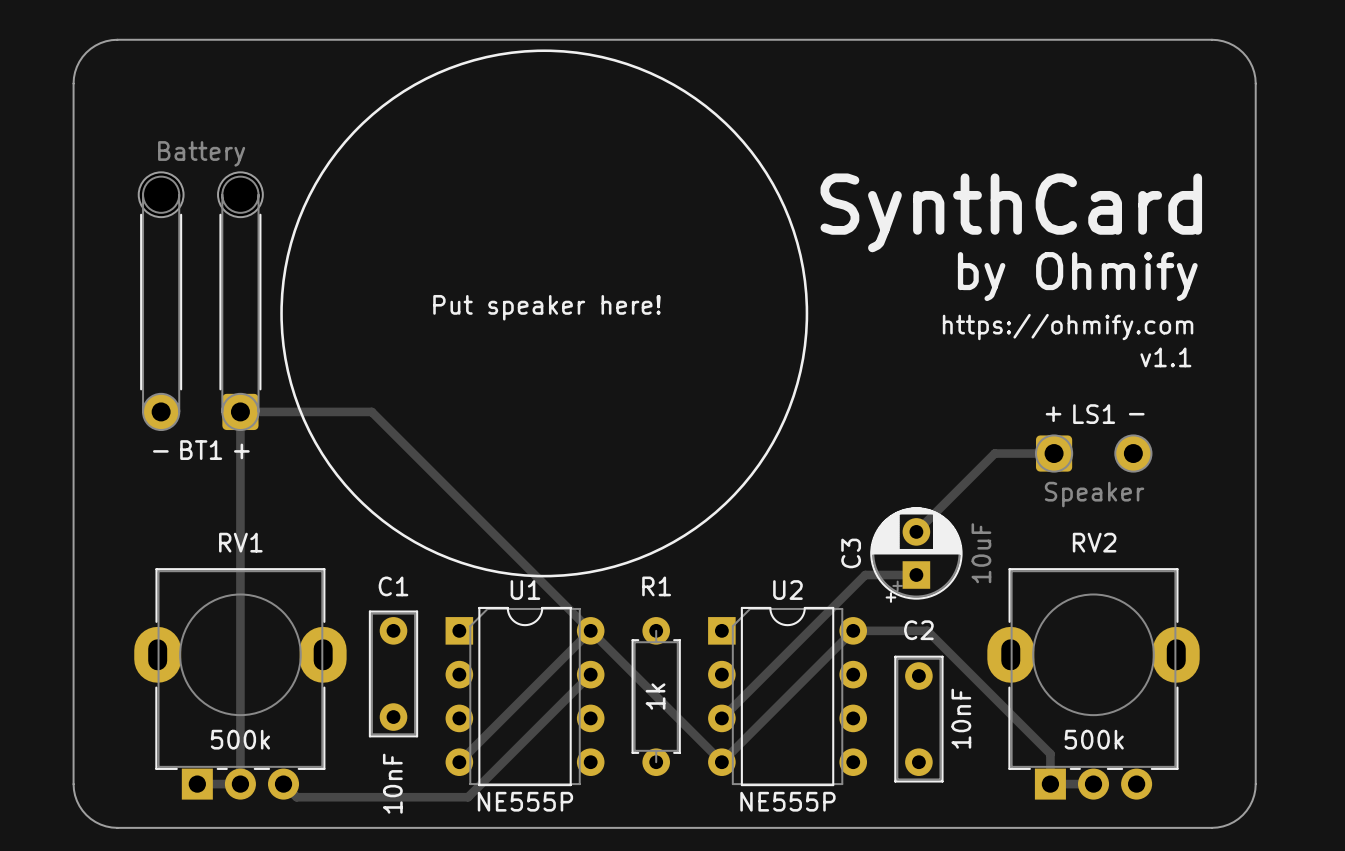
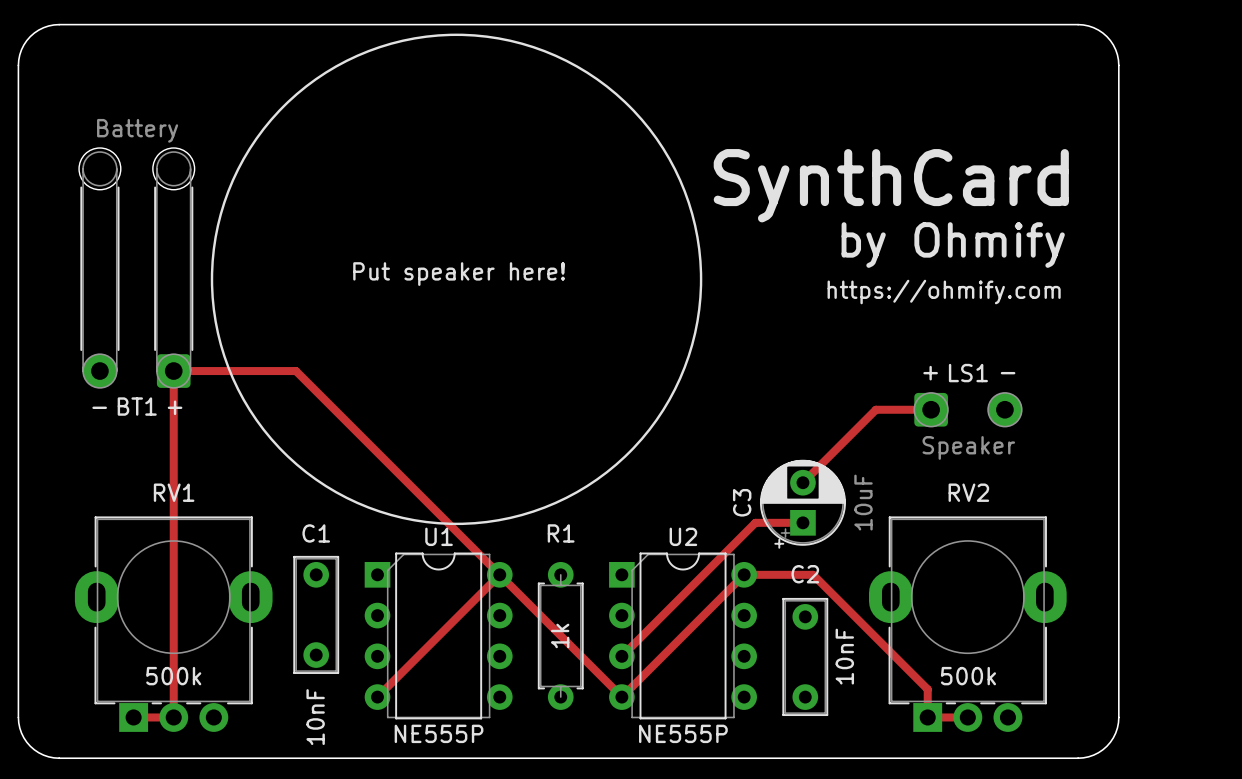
text: v1.1 (1165, 357) -> none
track: (590, 674) (468, 797) (296, 797) (283, 784) -> none

